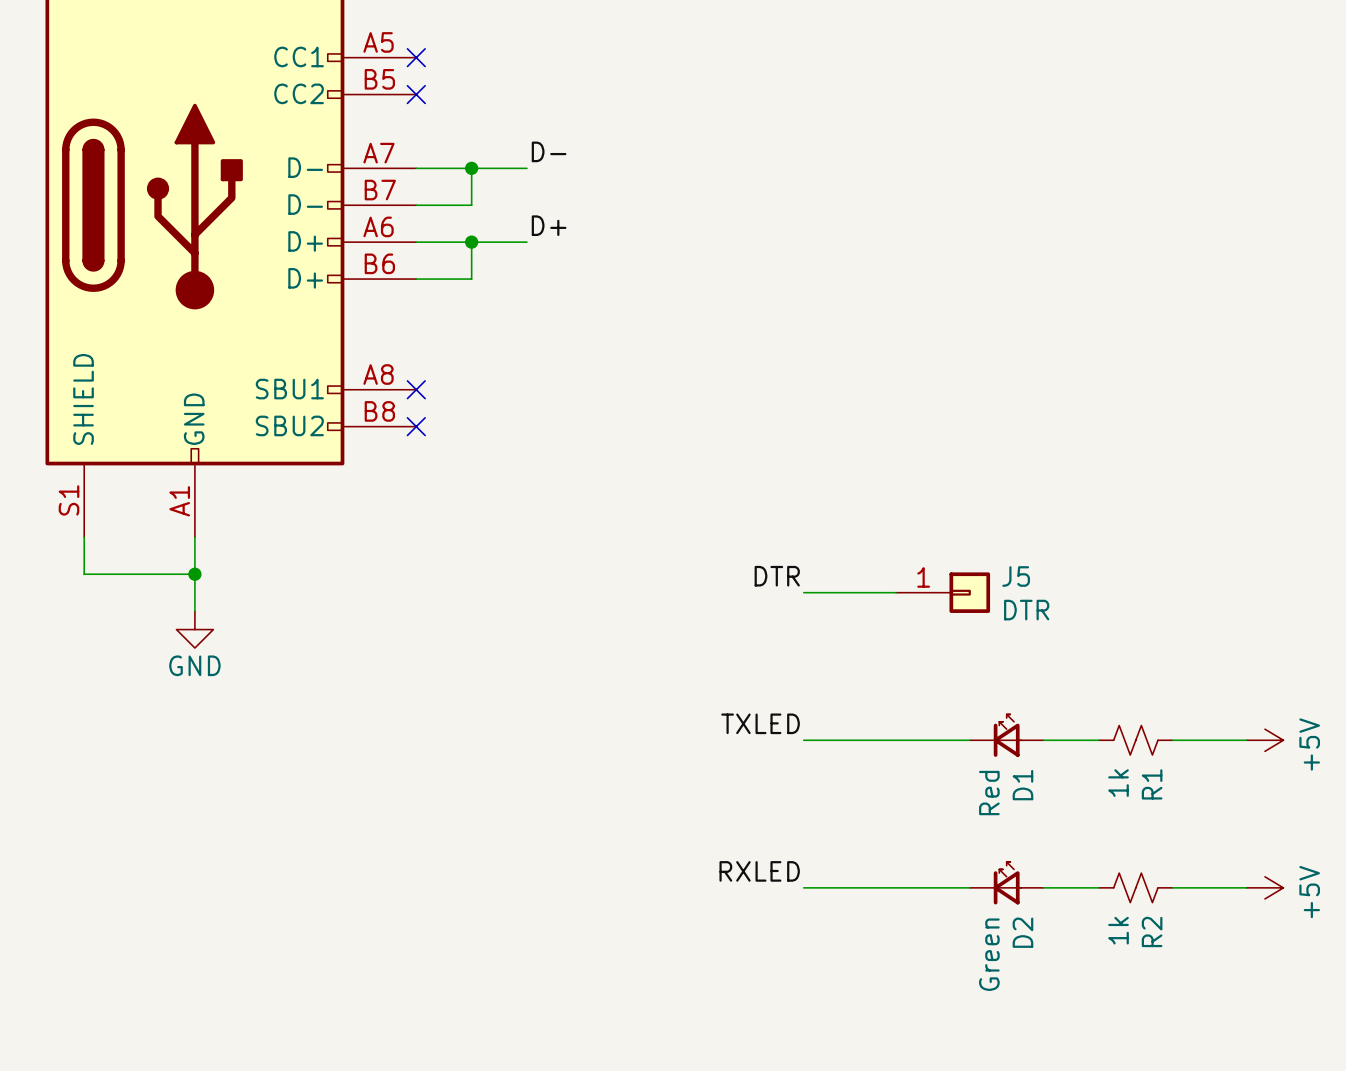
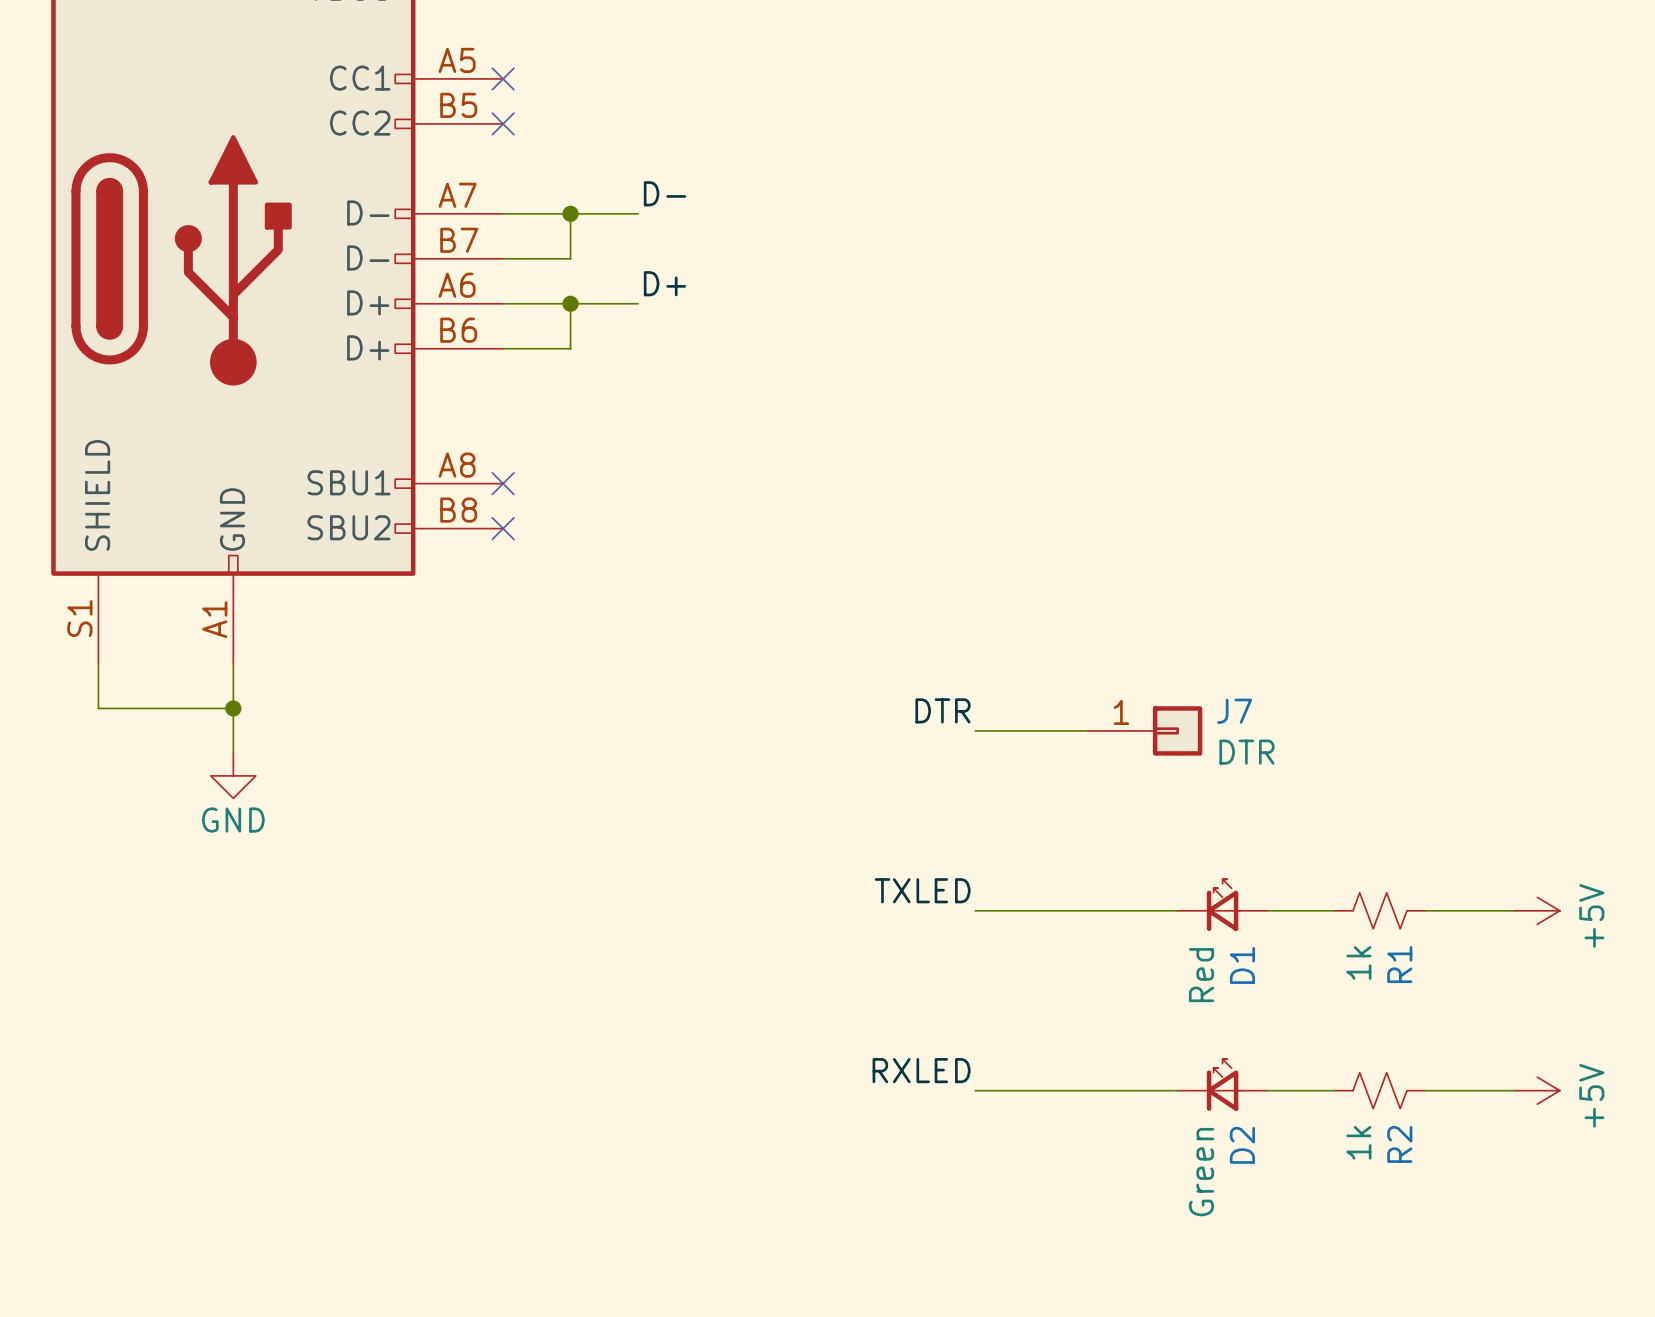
J5 name: J5 (1016, 576) -> J7 (1234, 711)

